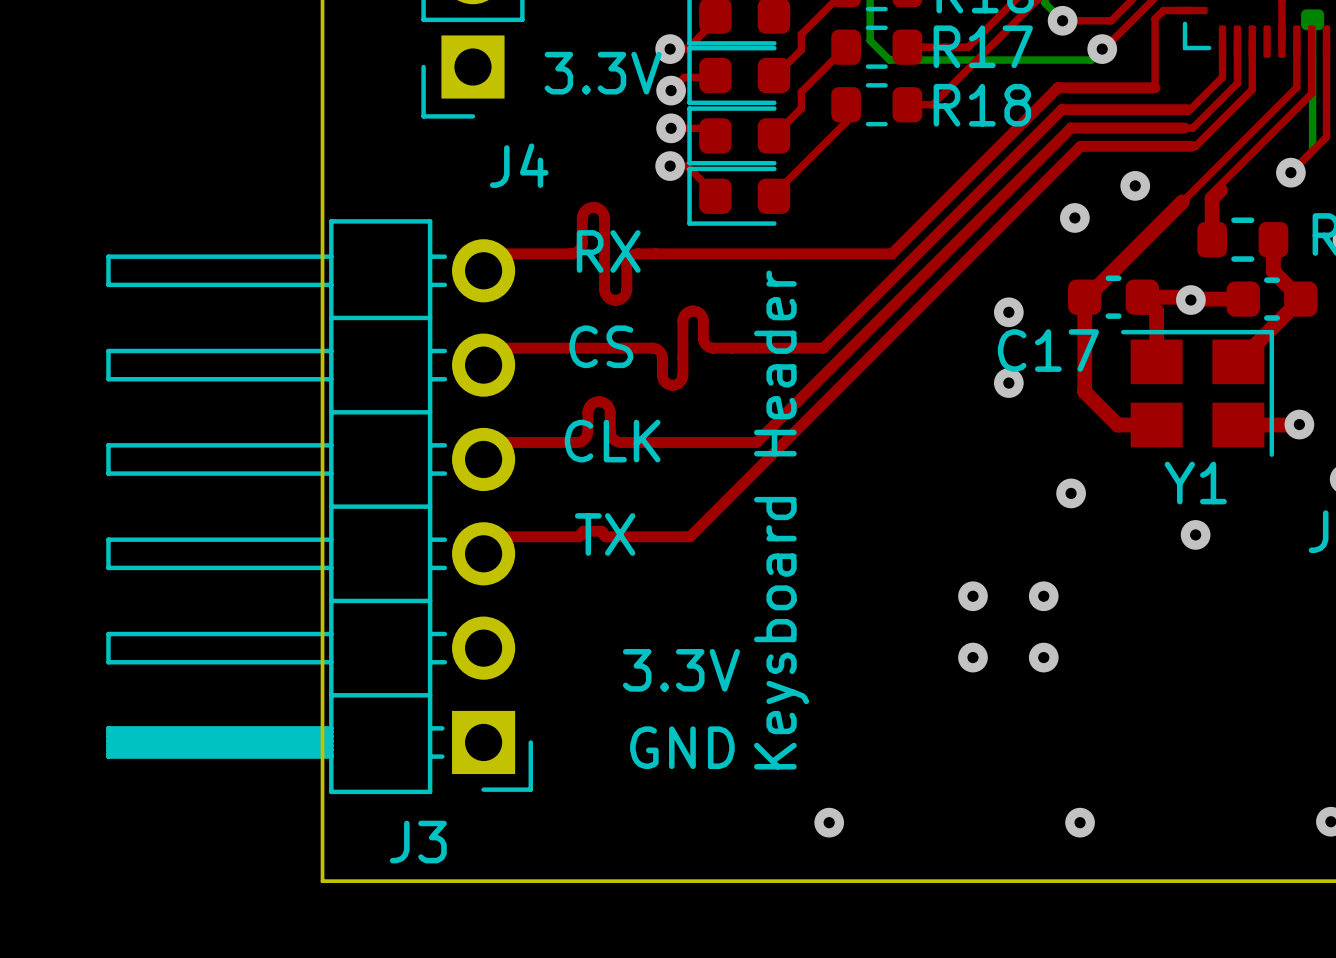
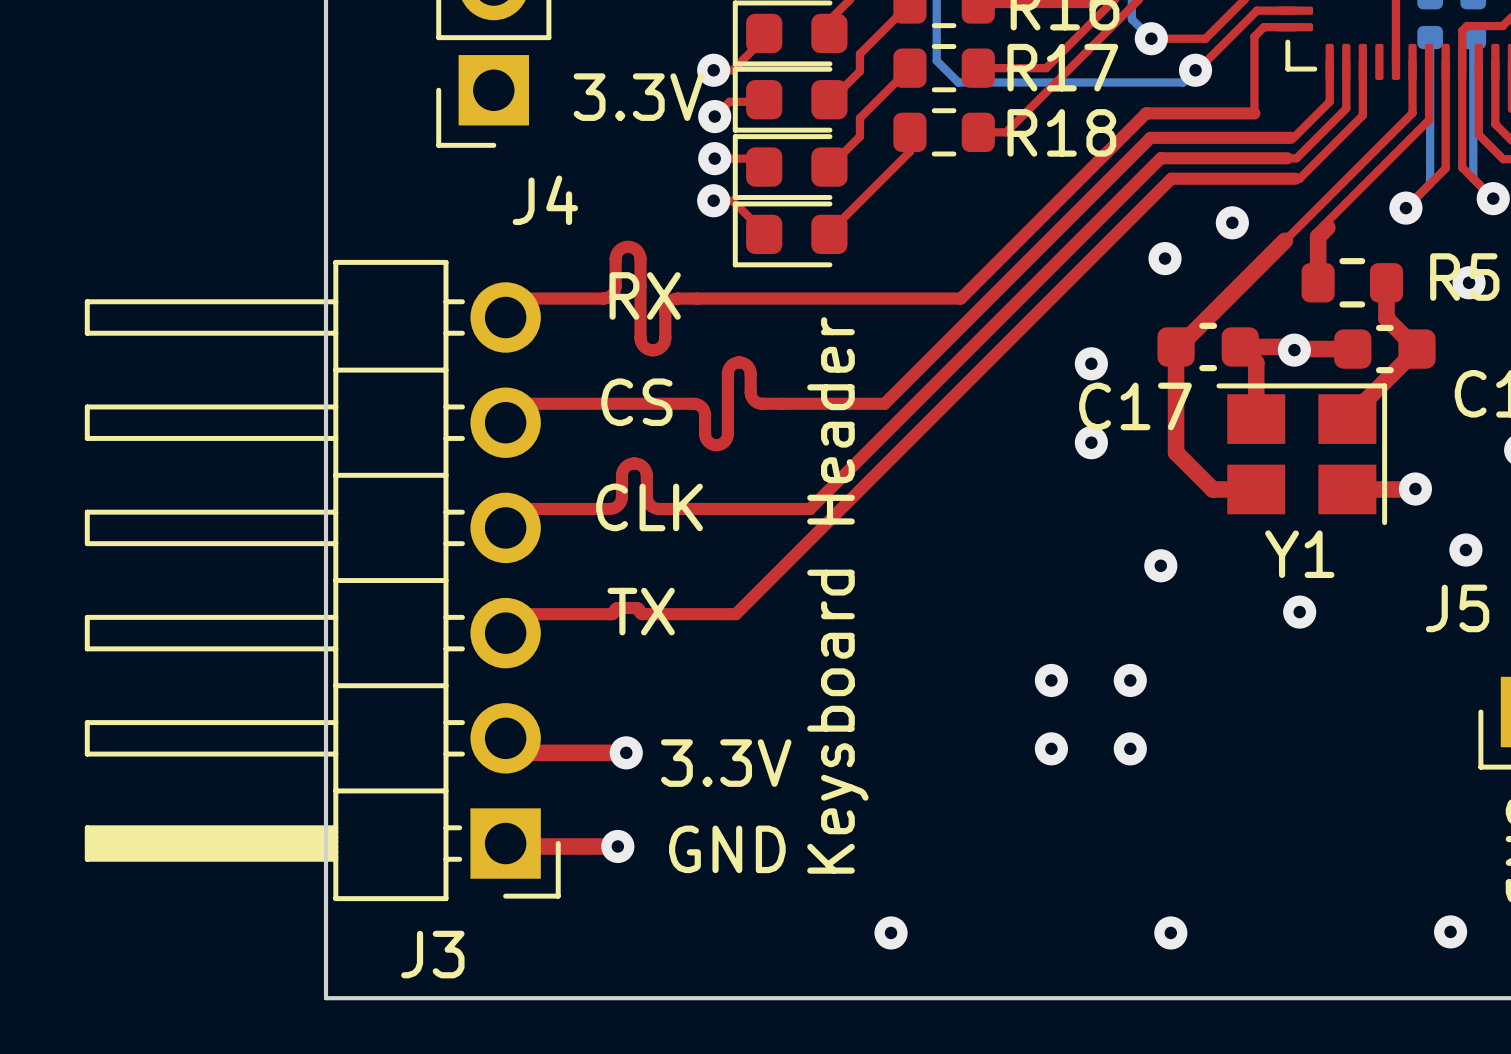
top track: none -> (505, 738) (520, 752) (626, 752)
via: none -> (626, 752)
top track: none -> (505, 843) (508, 846) (617, 846)
via: none -> (617, 846)

